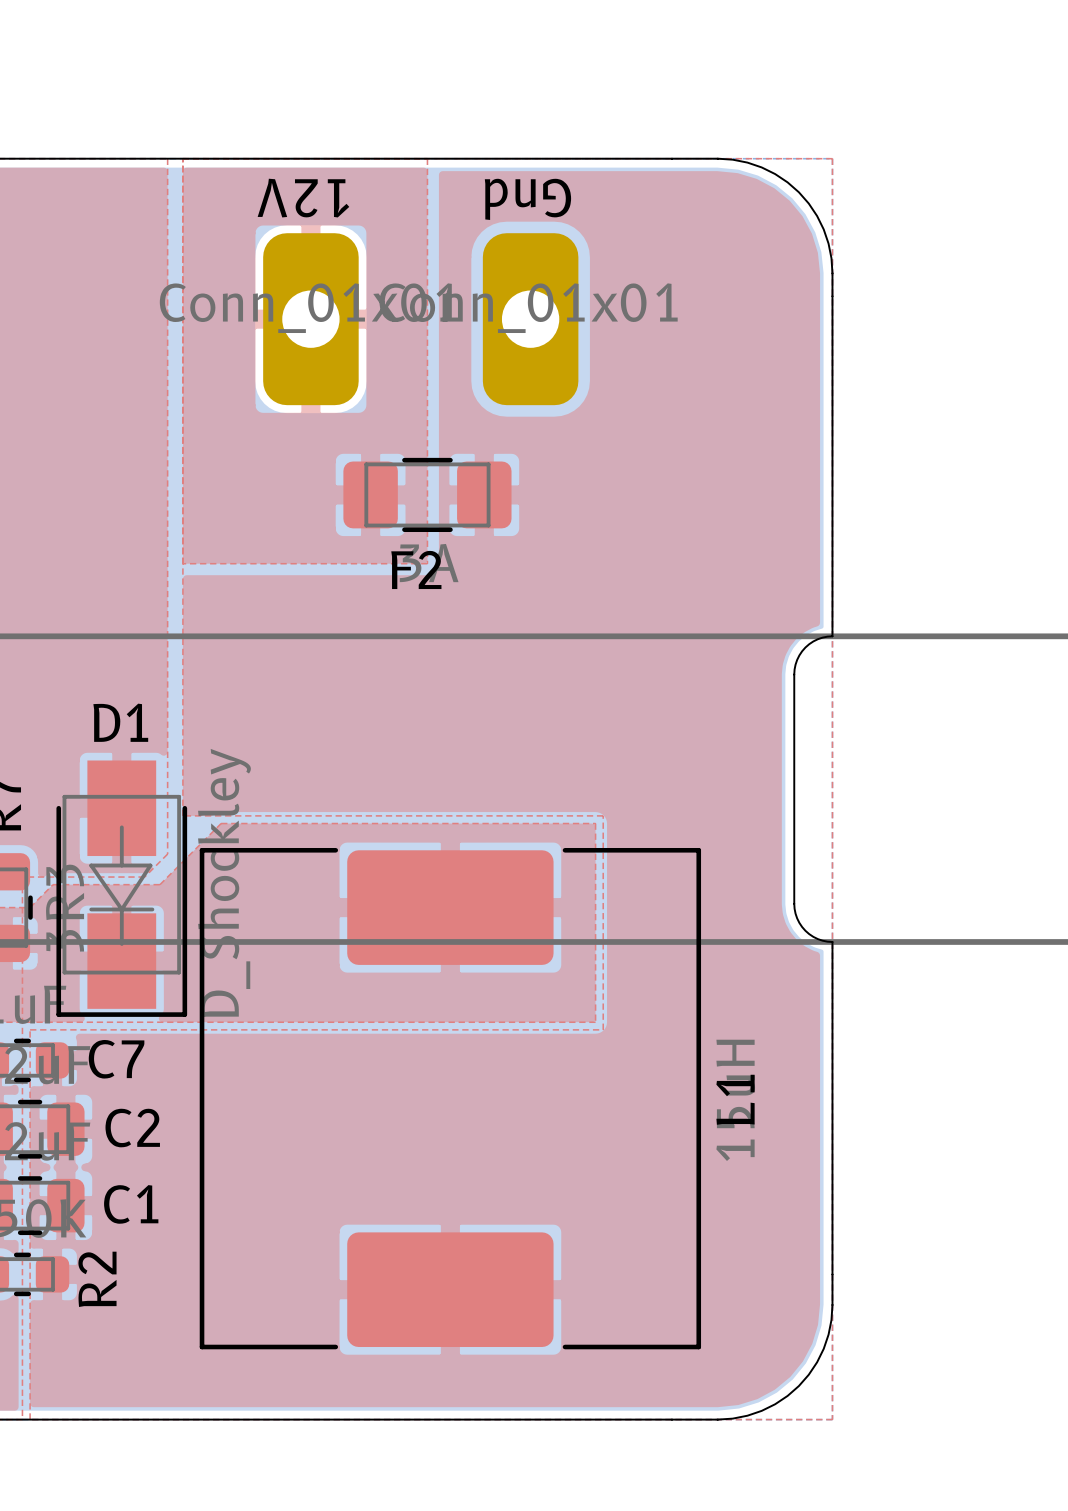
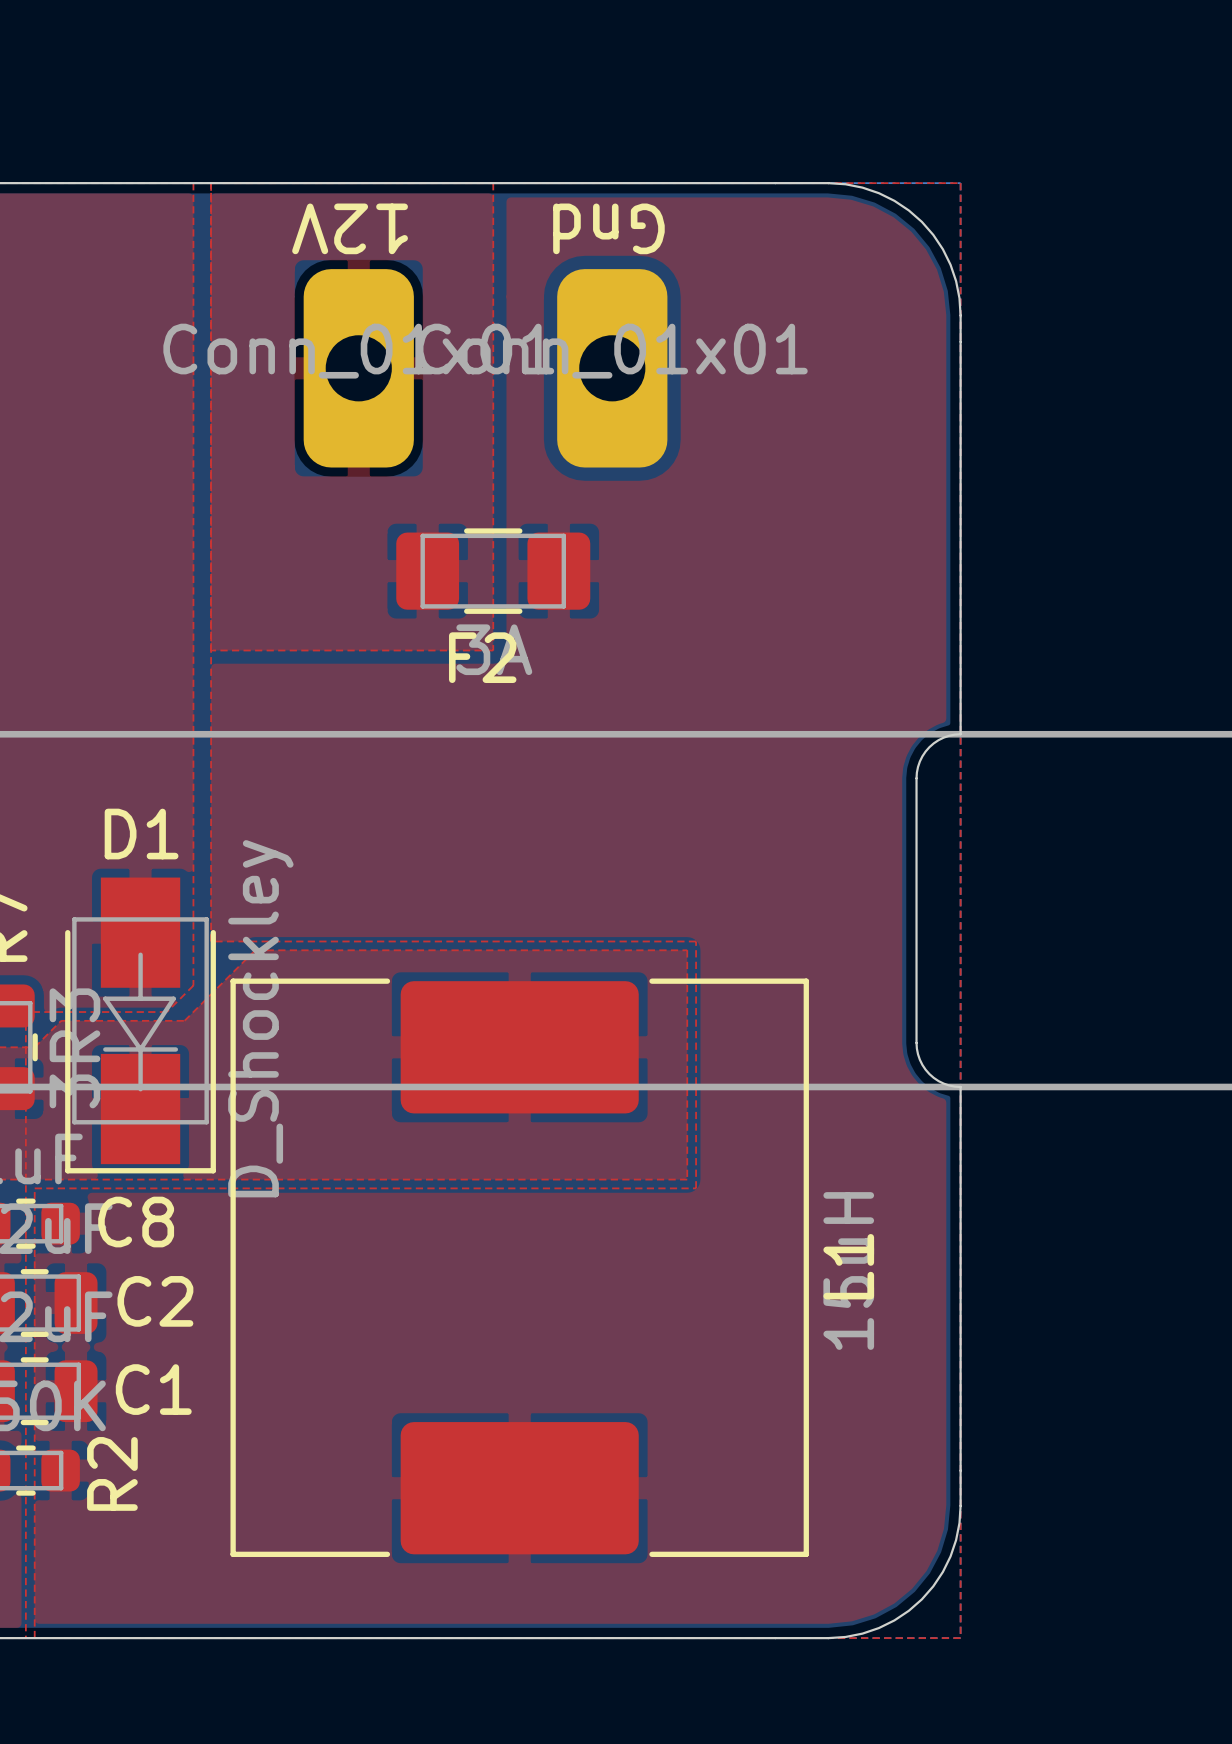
C7 name: C7 (116, 1059) -> C8 (136, 1222)

